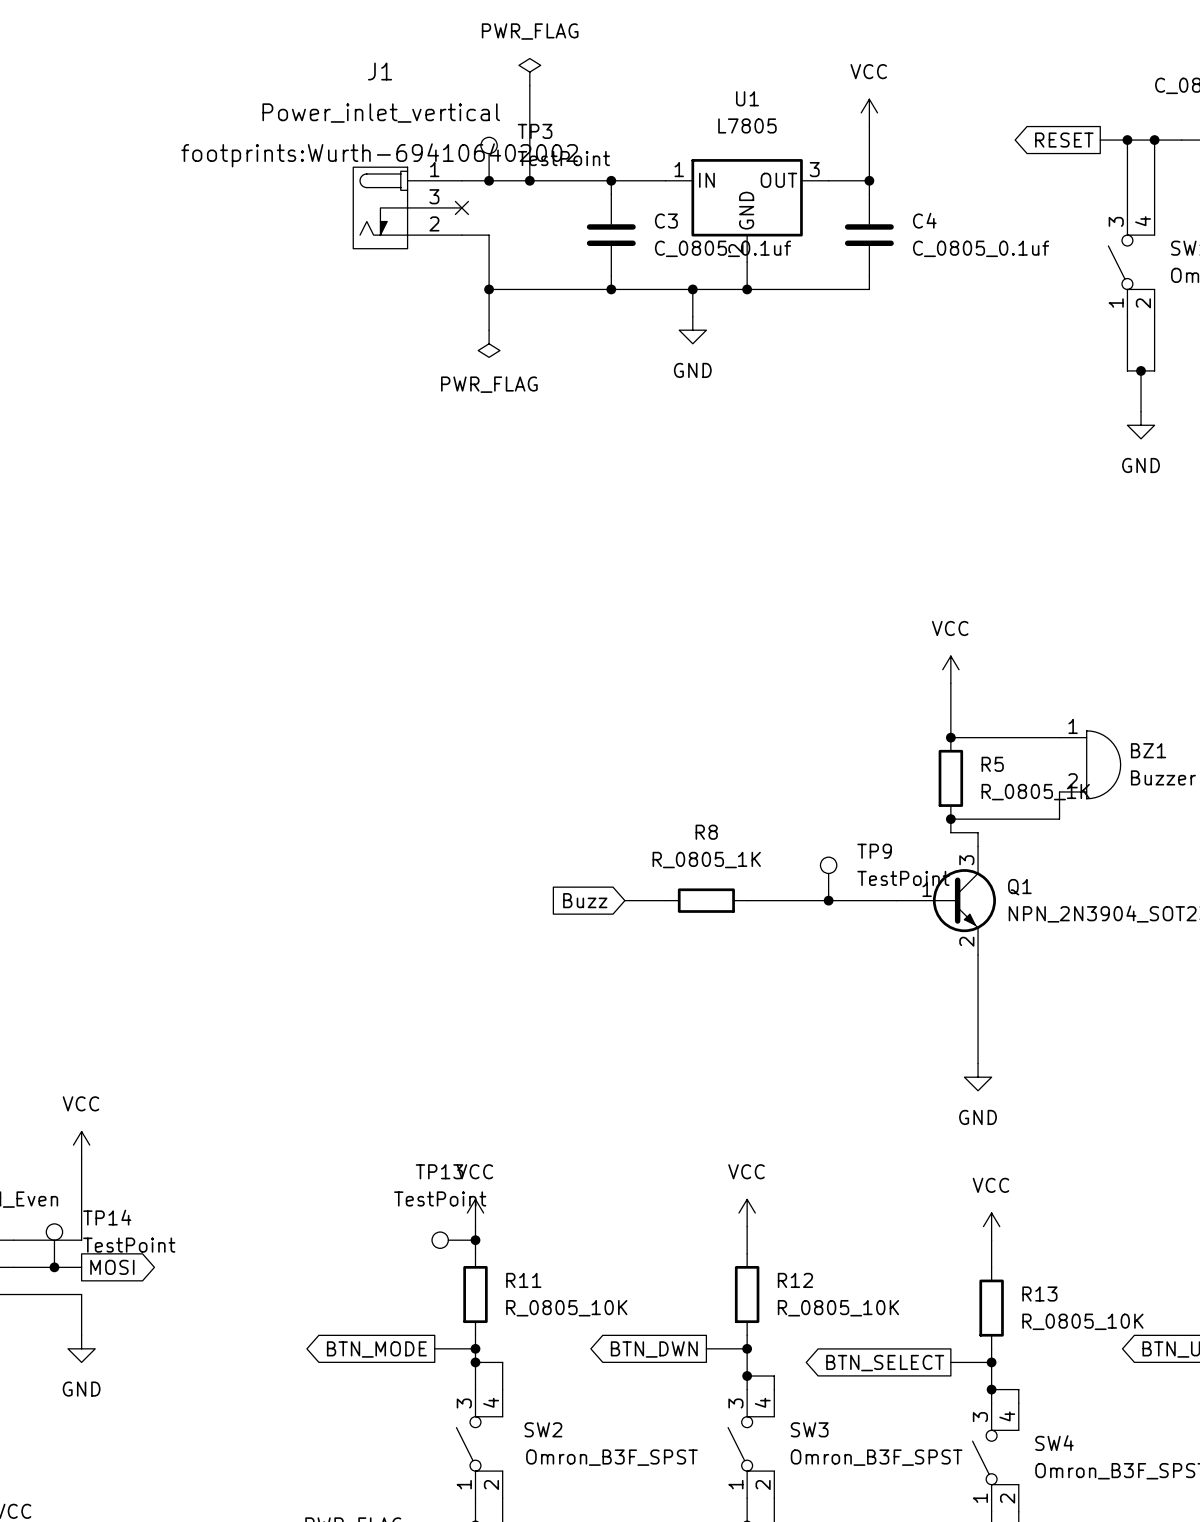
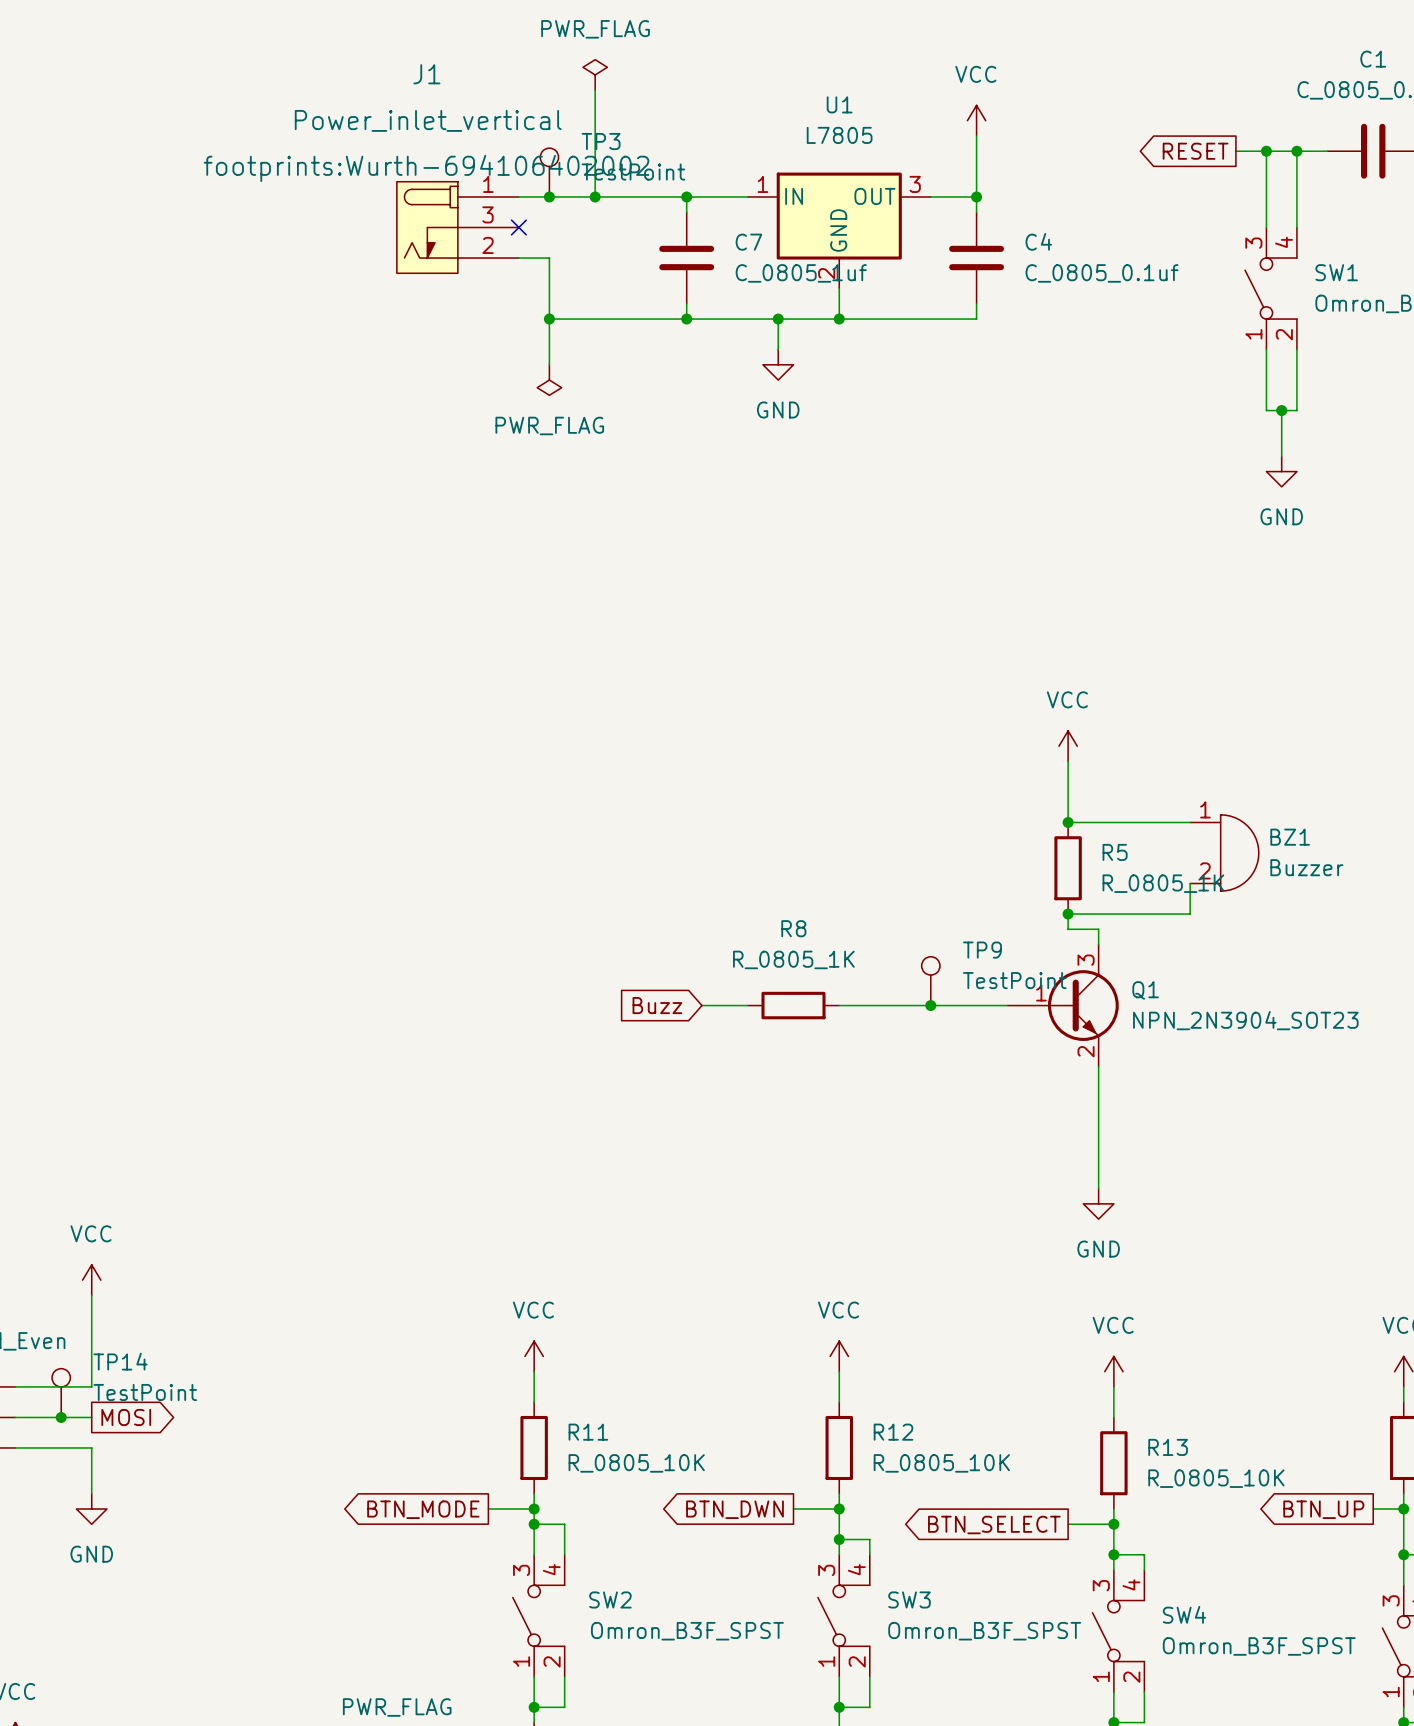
C3 name: C3 (666, 221) -> C7 (748, 242)
C3 value: C_0805_0.1uf (722, 248) -> C_0805_1uf (801, 273)
TP13: TestPoint (453, 1240) -> none
junction: (475, 1240) -> none

